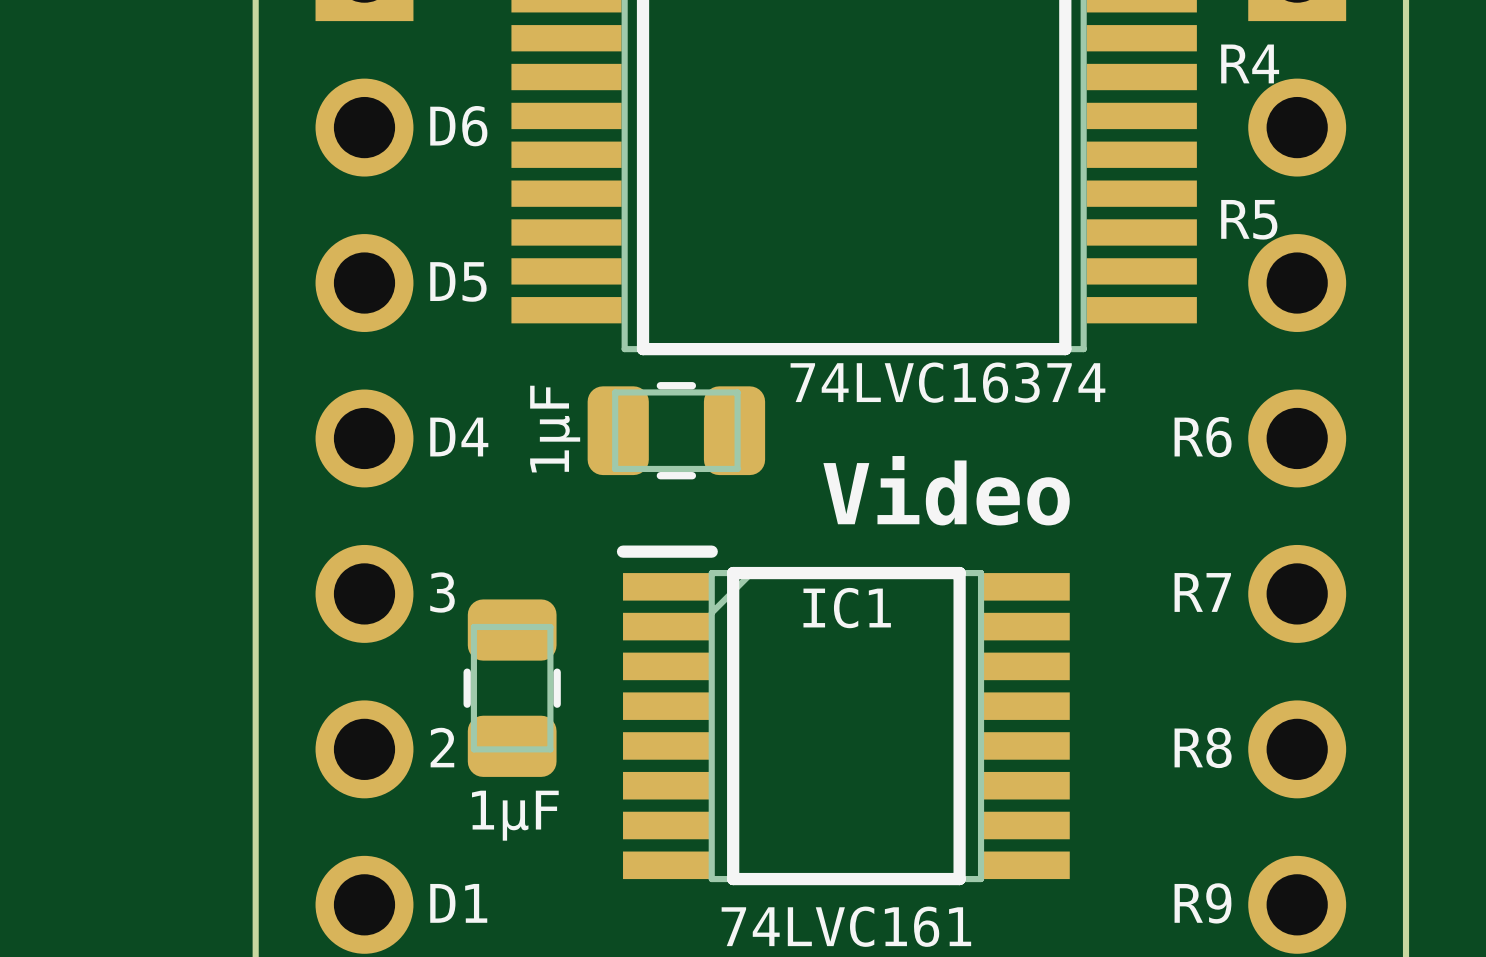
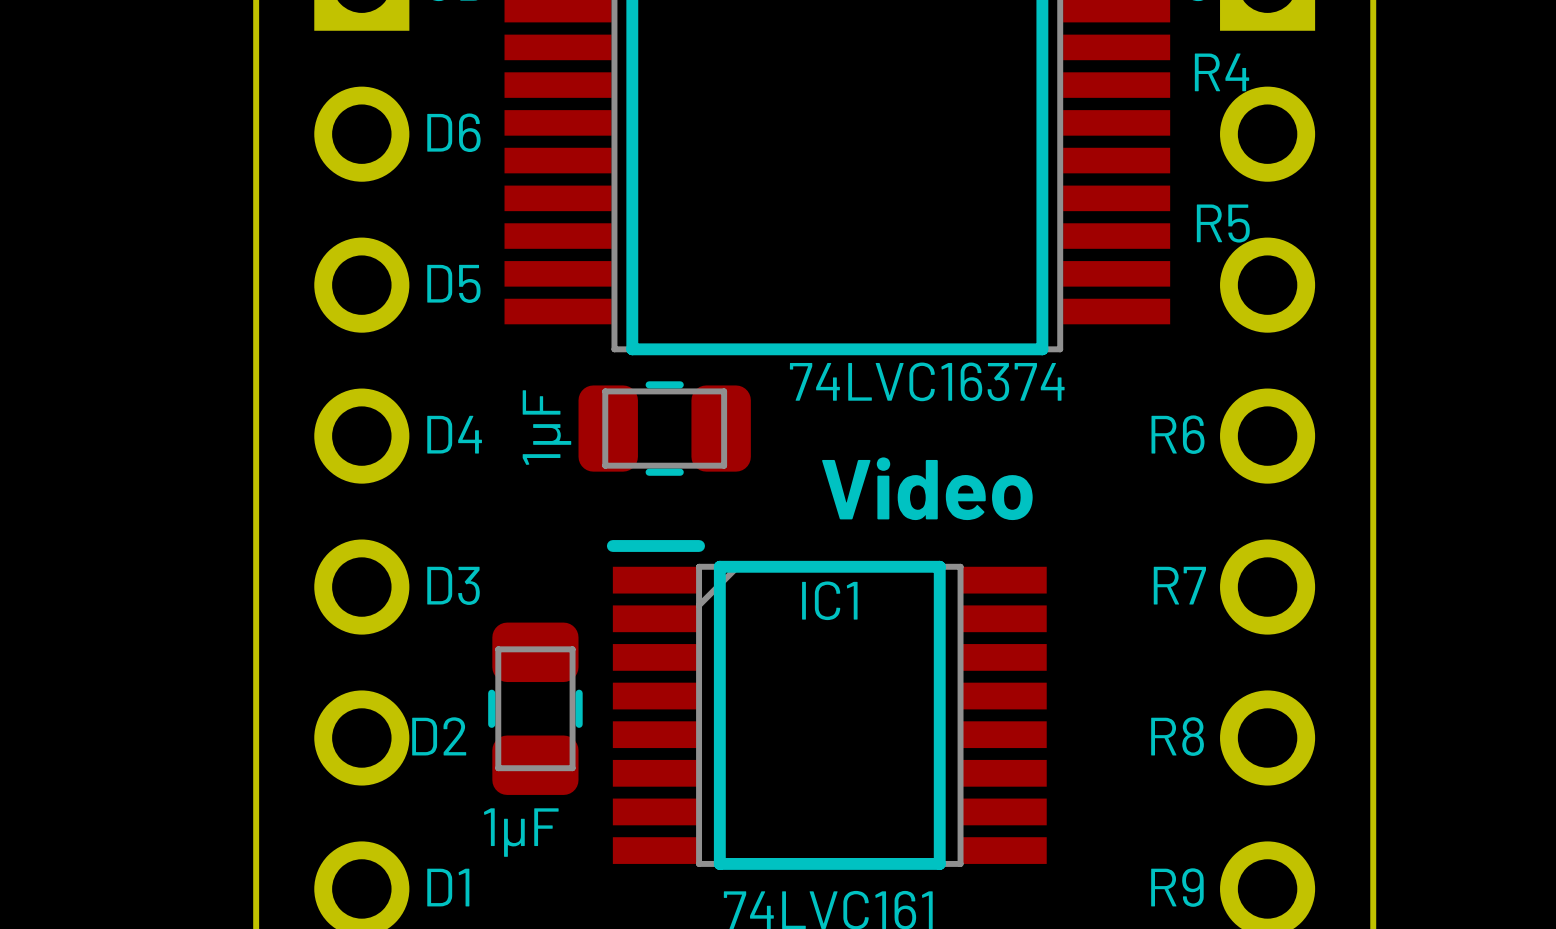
text: 3 (442, 592) -> D3 (453, 585)
part position: (512, 688) -> (535, 708)
text: 2 (442, 747) -> D2 (439, 736)
part value position: 1μF (515, 815) -> 1μF (521, 832)

